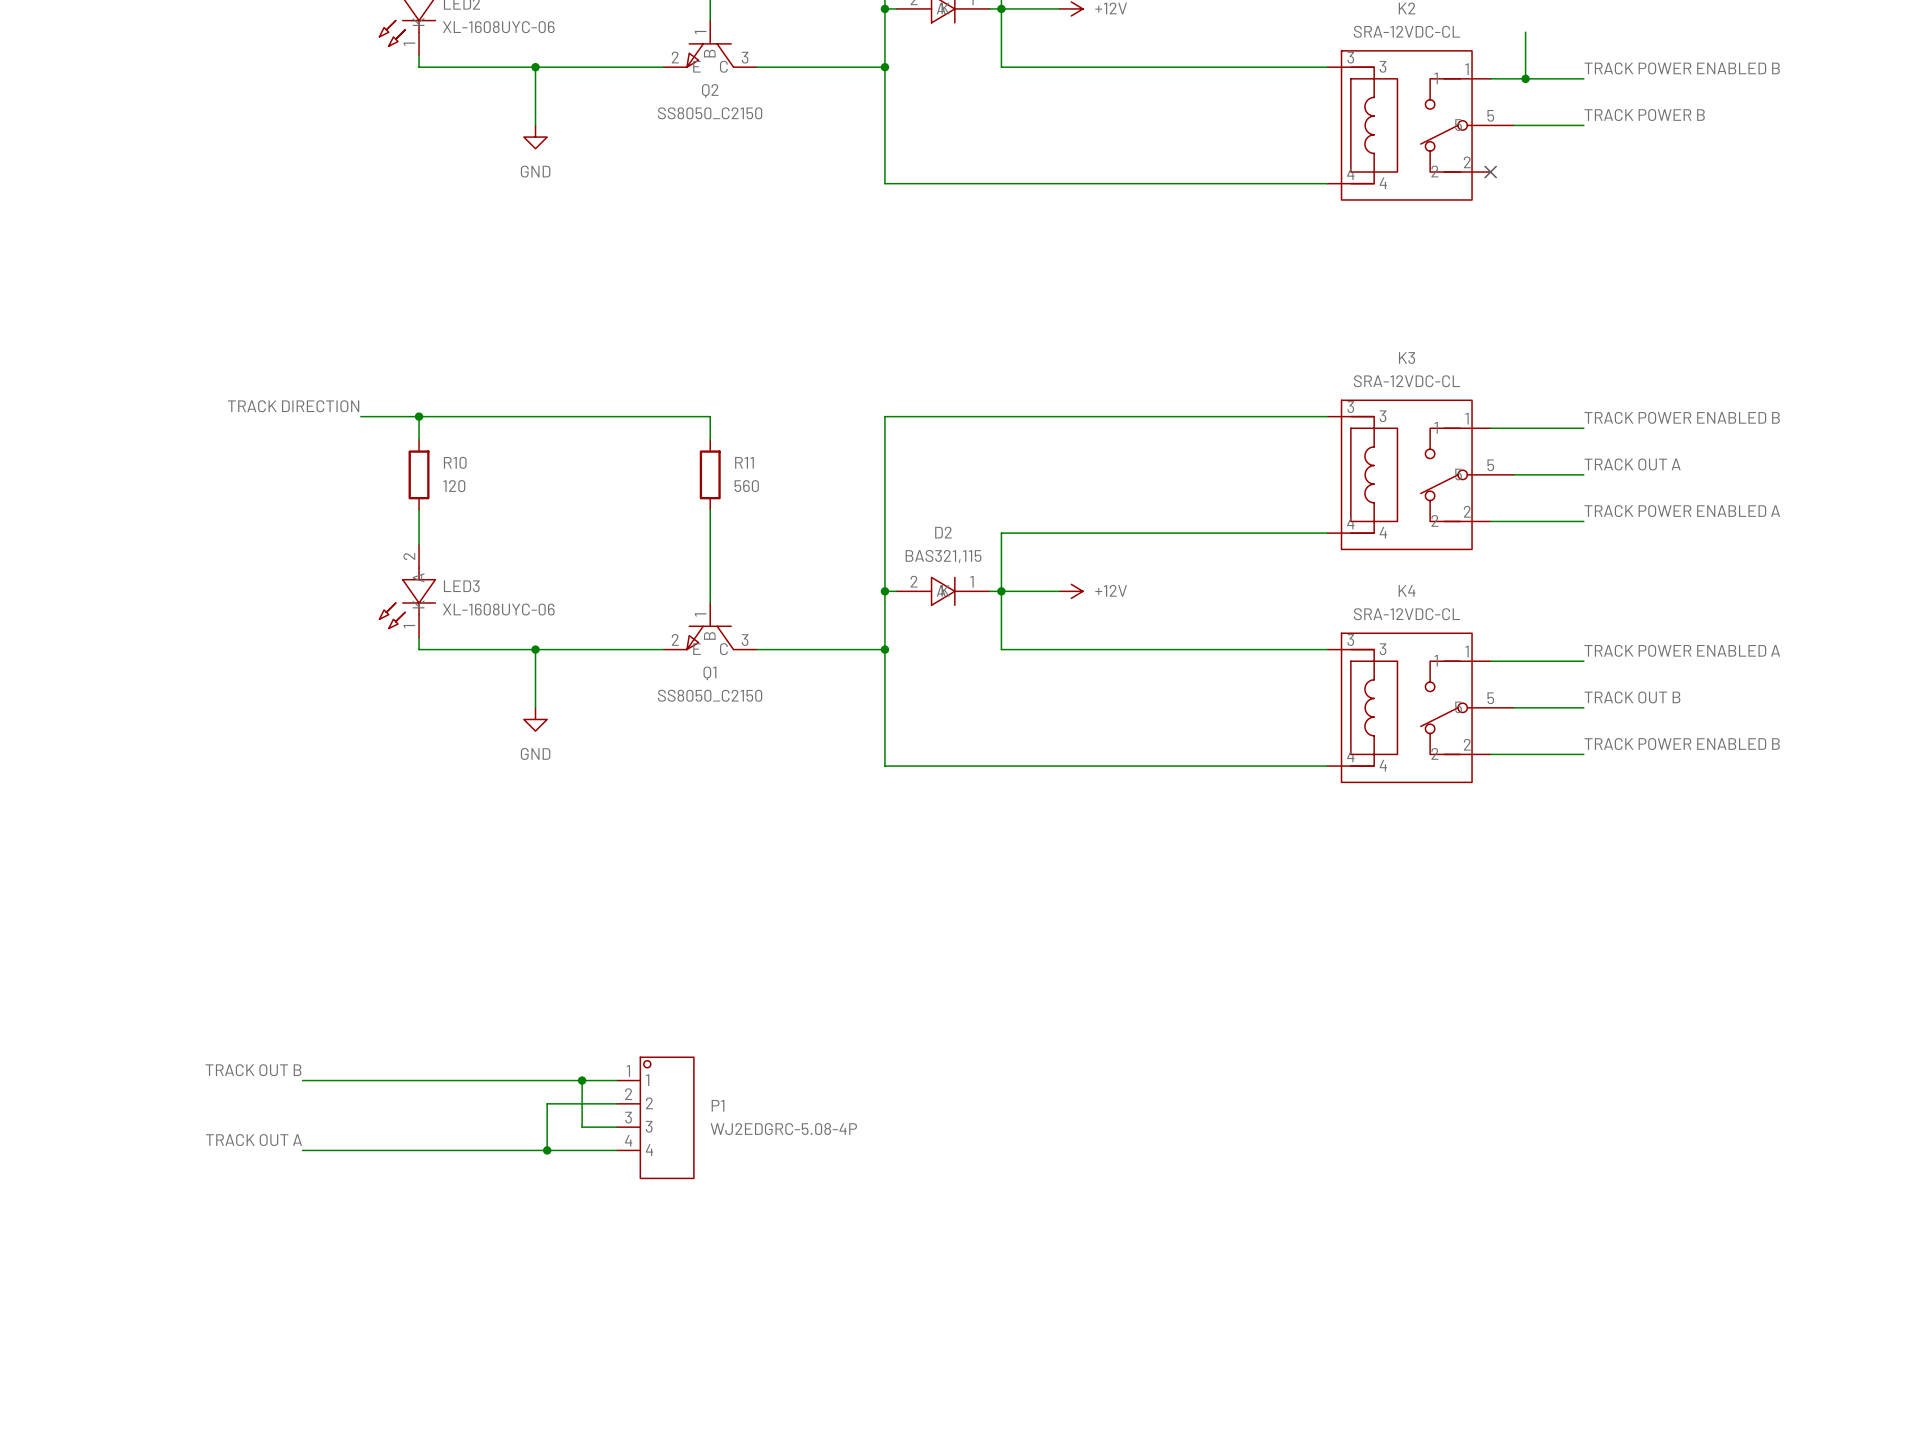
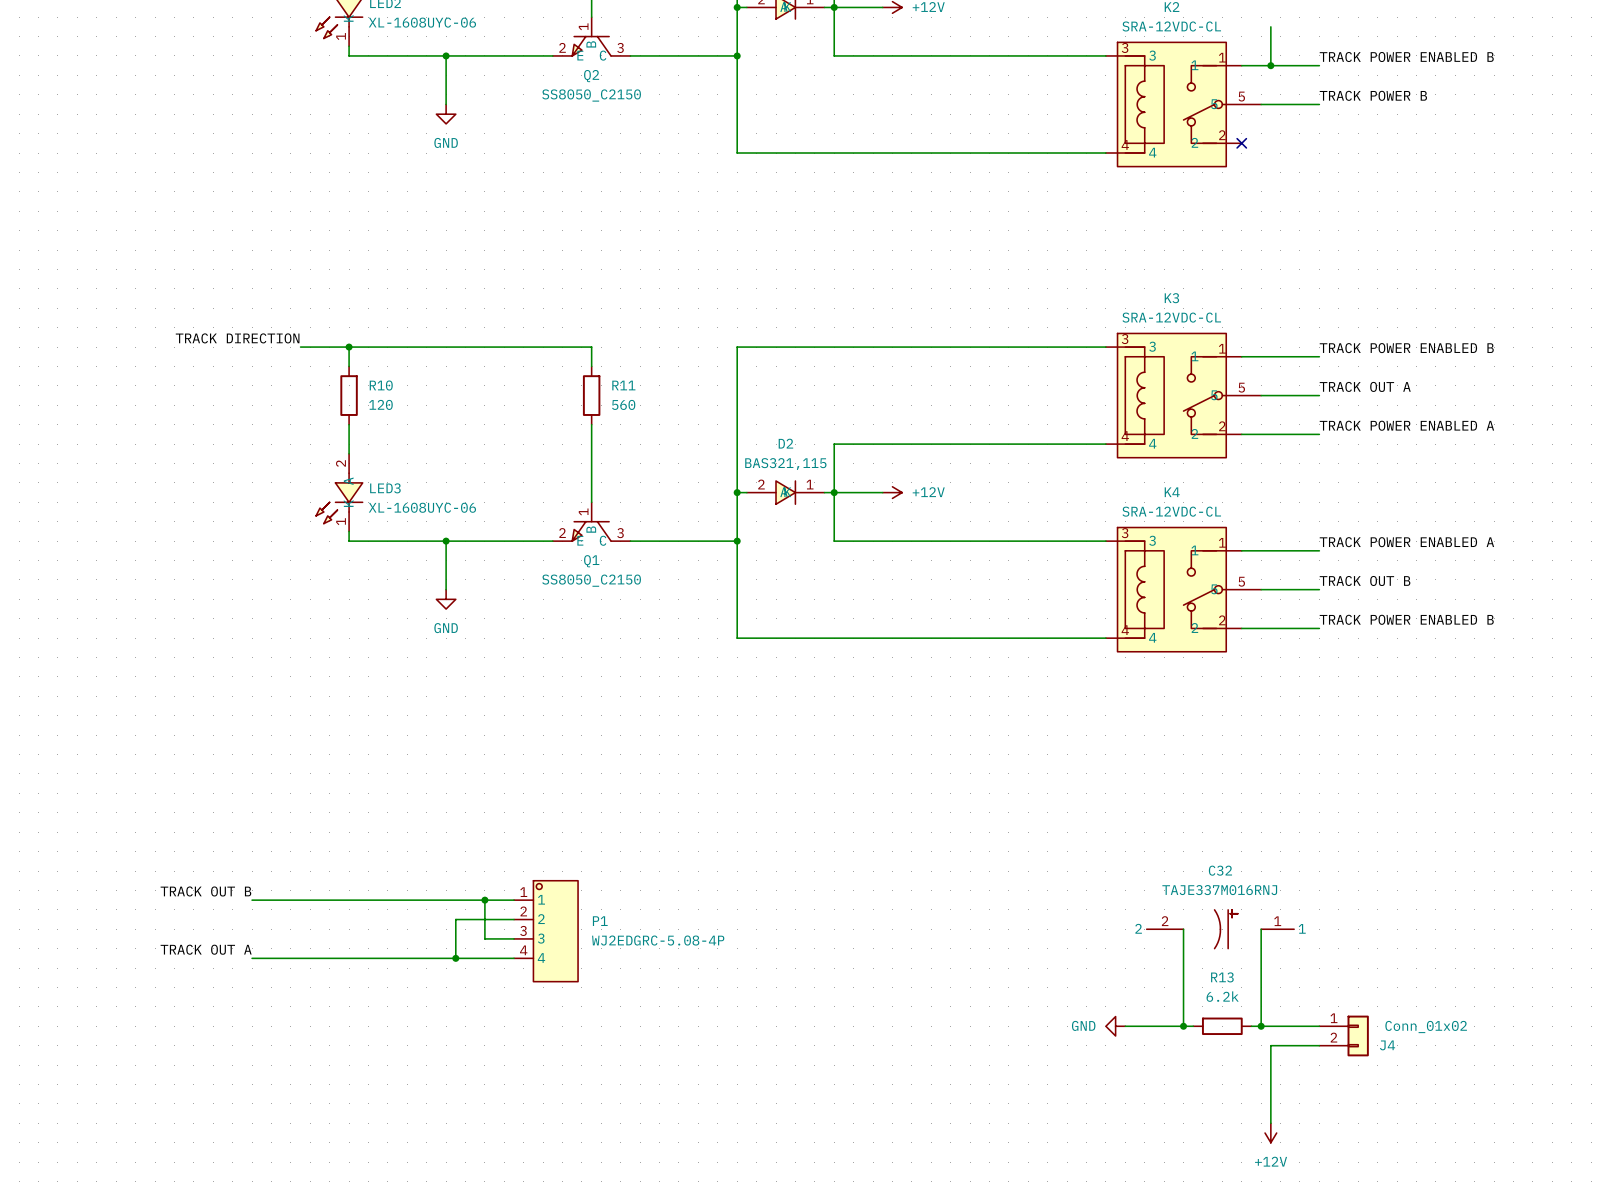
wire: none -> (1183, 929) (1183, 1026)
C32: none -> TAJE337M016RNJ (1220, 929)
wire: none -> (1261, 929) (1261, 1026)
power symbol: none -> GND (1115, 1026)
wire: none -> (1125, 1026) (1193, 1026)
junction: none -> (1183, 1026)
R13: none -> 6.2k (1222, 1026)
wire: none -> (1251, 1026) (1319, 1026)
junction: none -> (1261, 1026)
J4: none -> Conn_01x02 (1344, 1035)
wire: none -> (1319, 1045) (1270, 1045) (1270, 1123)
power symbol: none -> +12V (1270, 1133)

